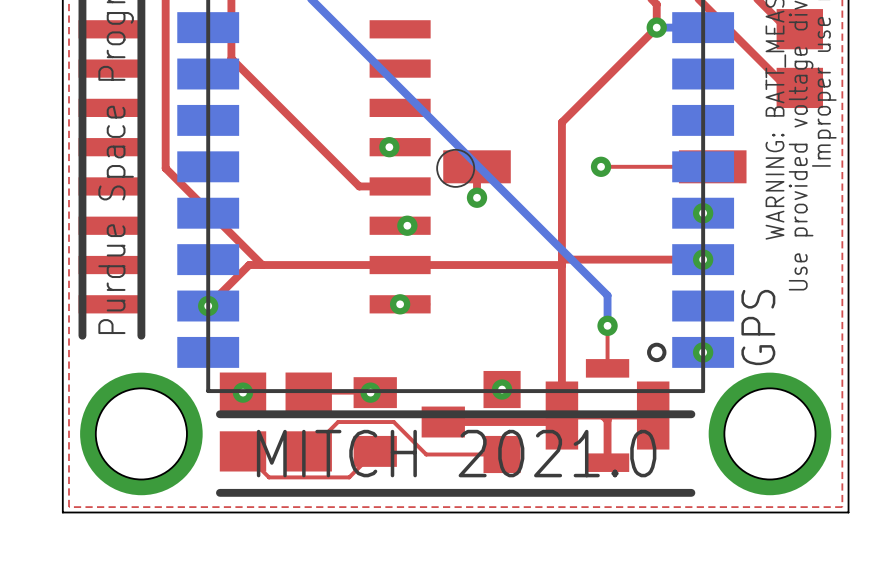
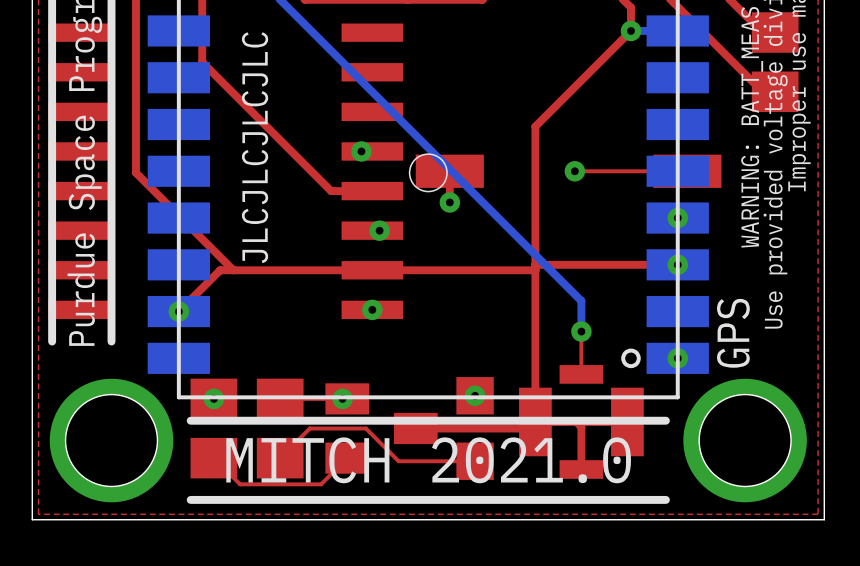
text: none -> JLCJLCJLCJLC (255, 147)

